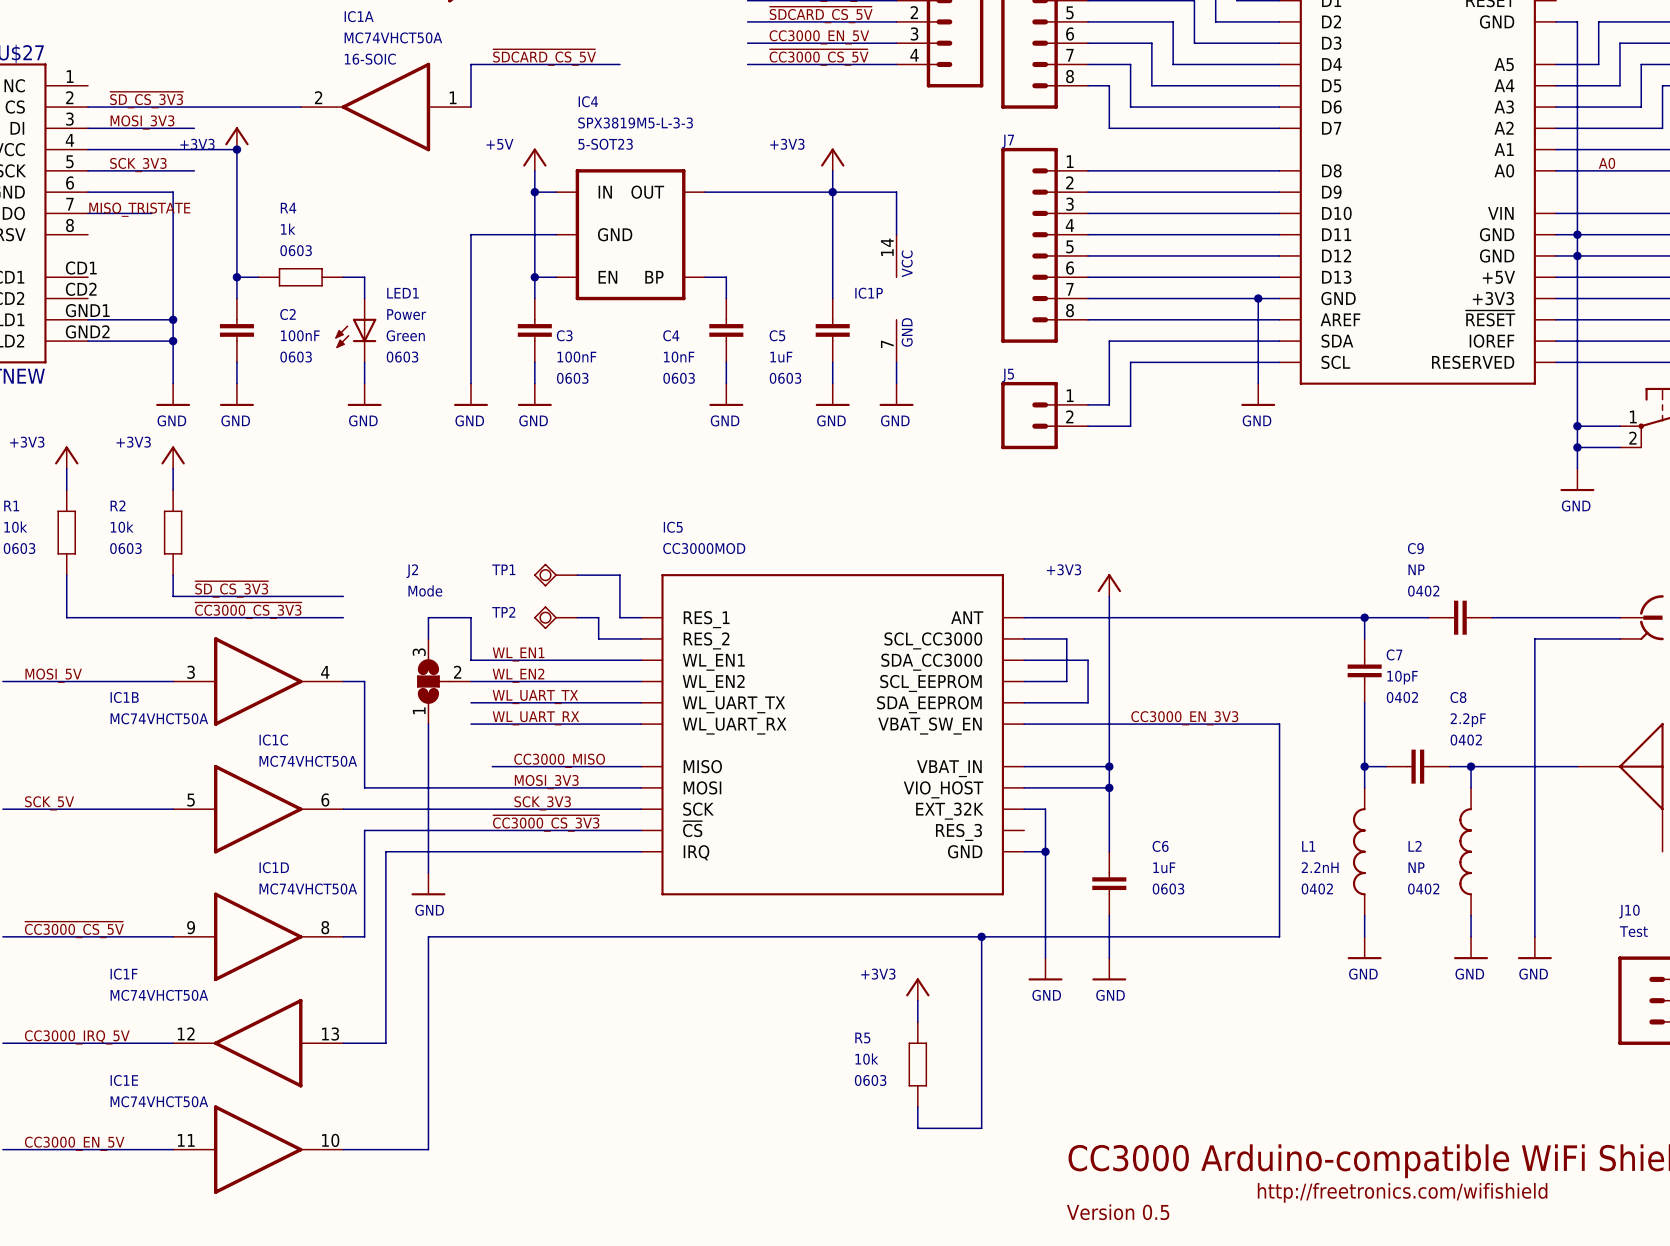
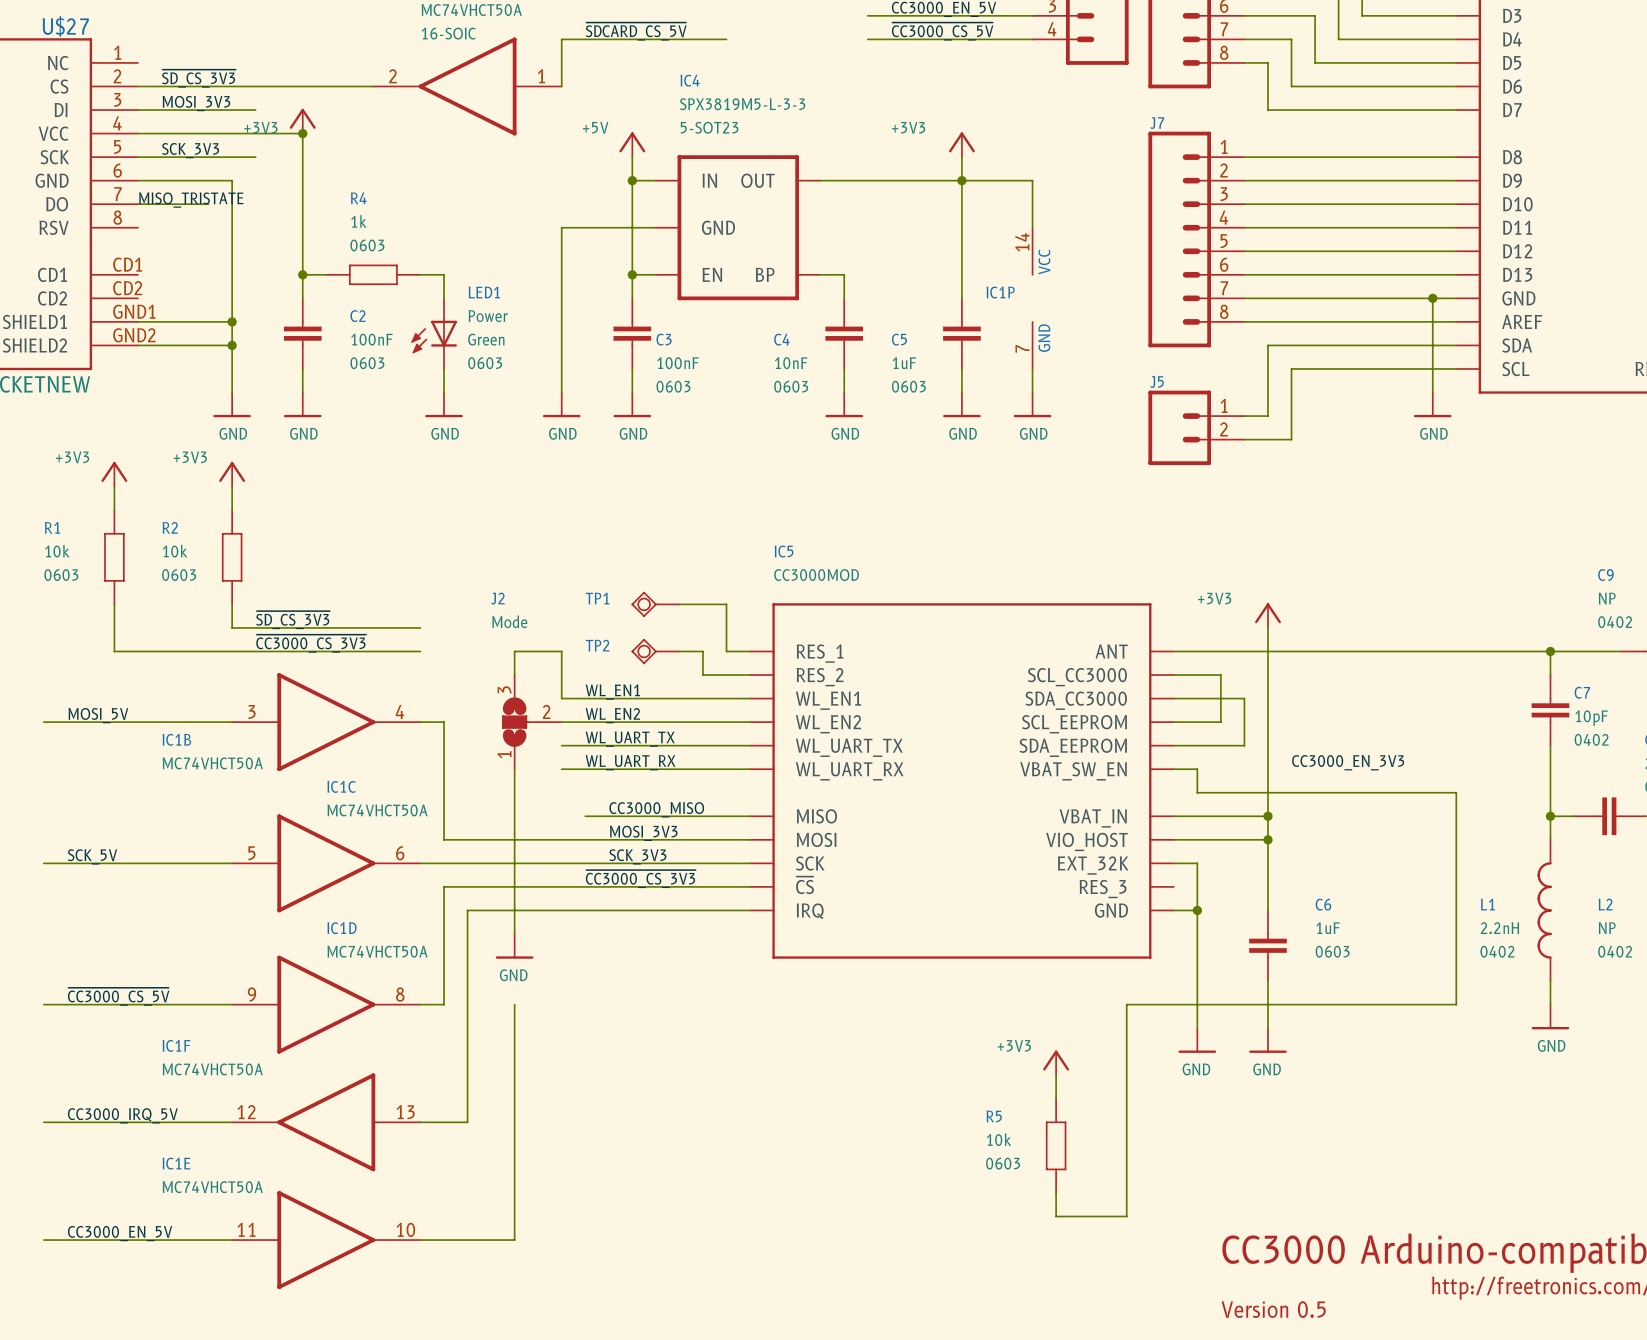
wire: (1045, 724) (1279, 724) (1279, 745) -> (1197, 769) (1197, 792) (1456, 792)
wire: (428, 936) (981, 936) -> none
junction: (981, 936) -> none

